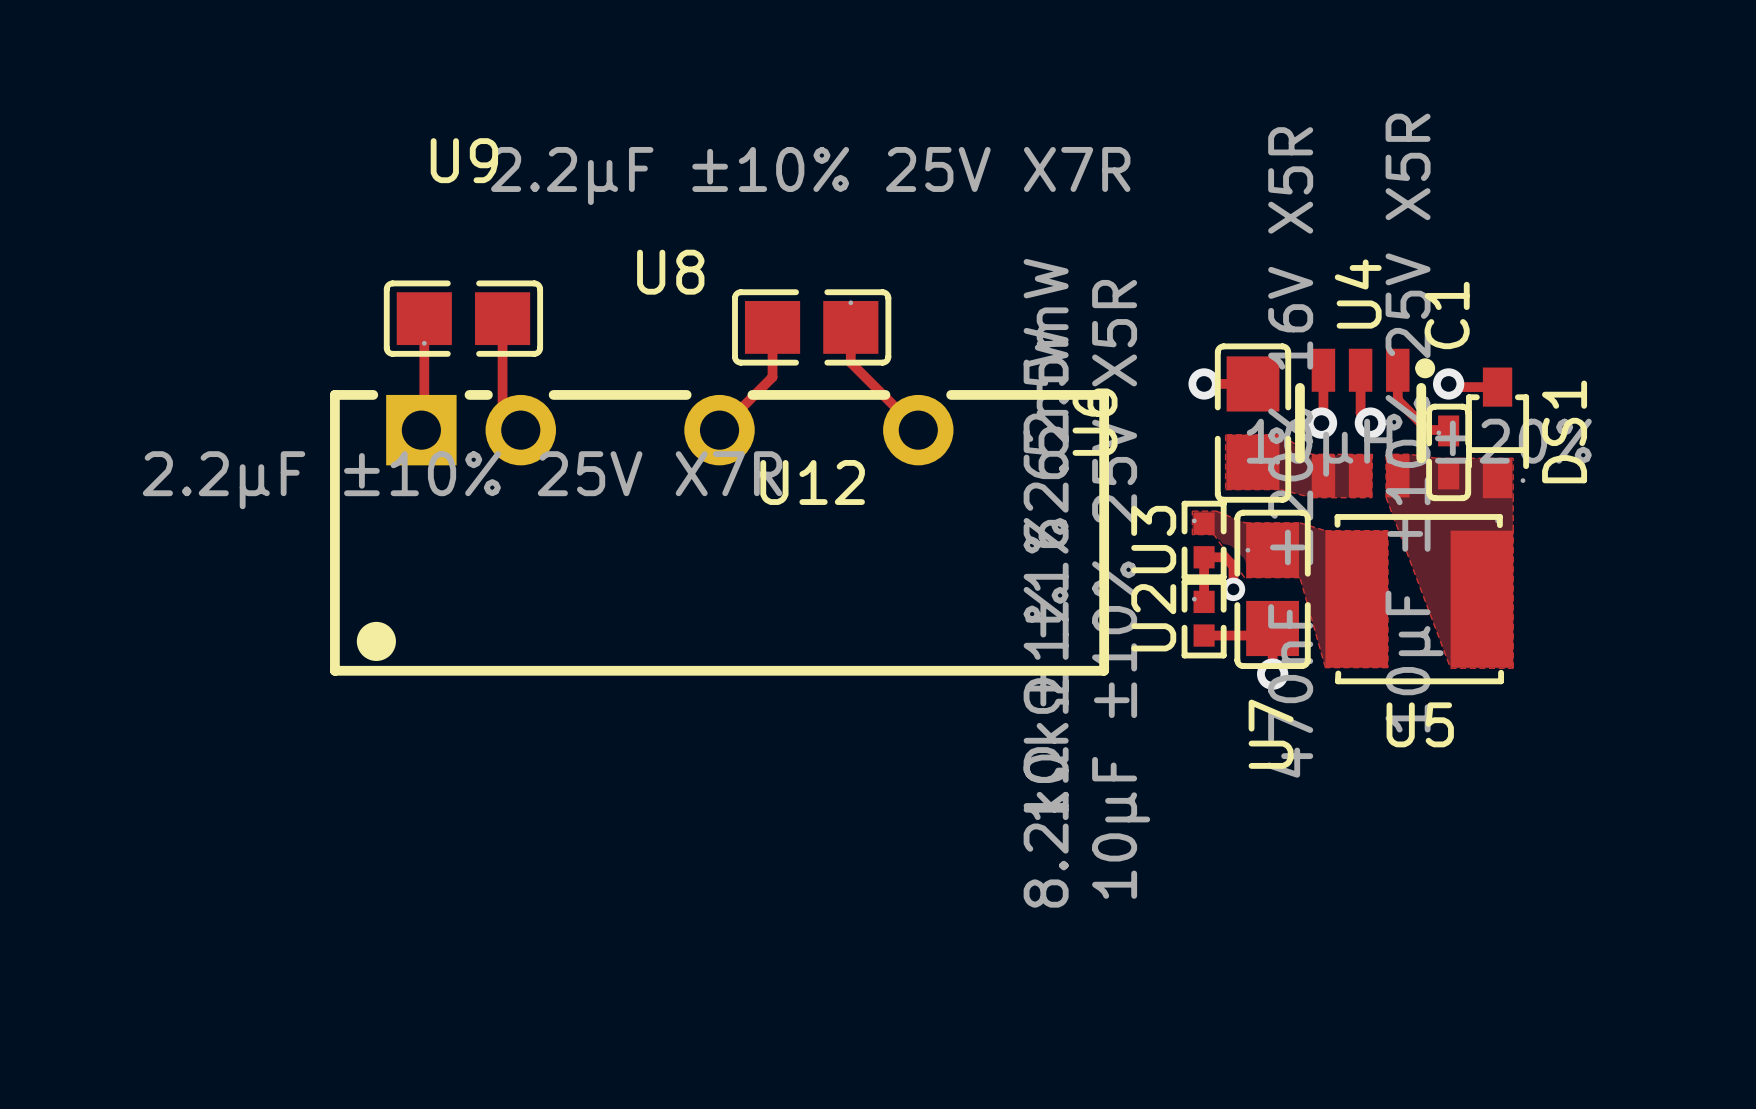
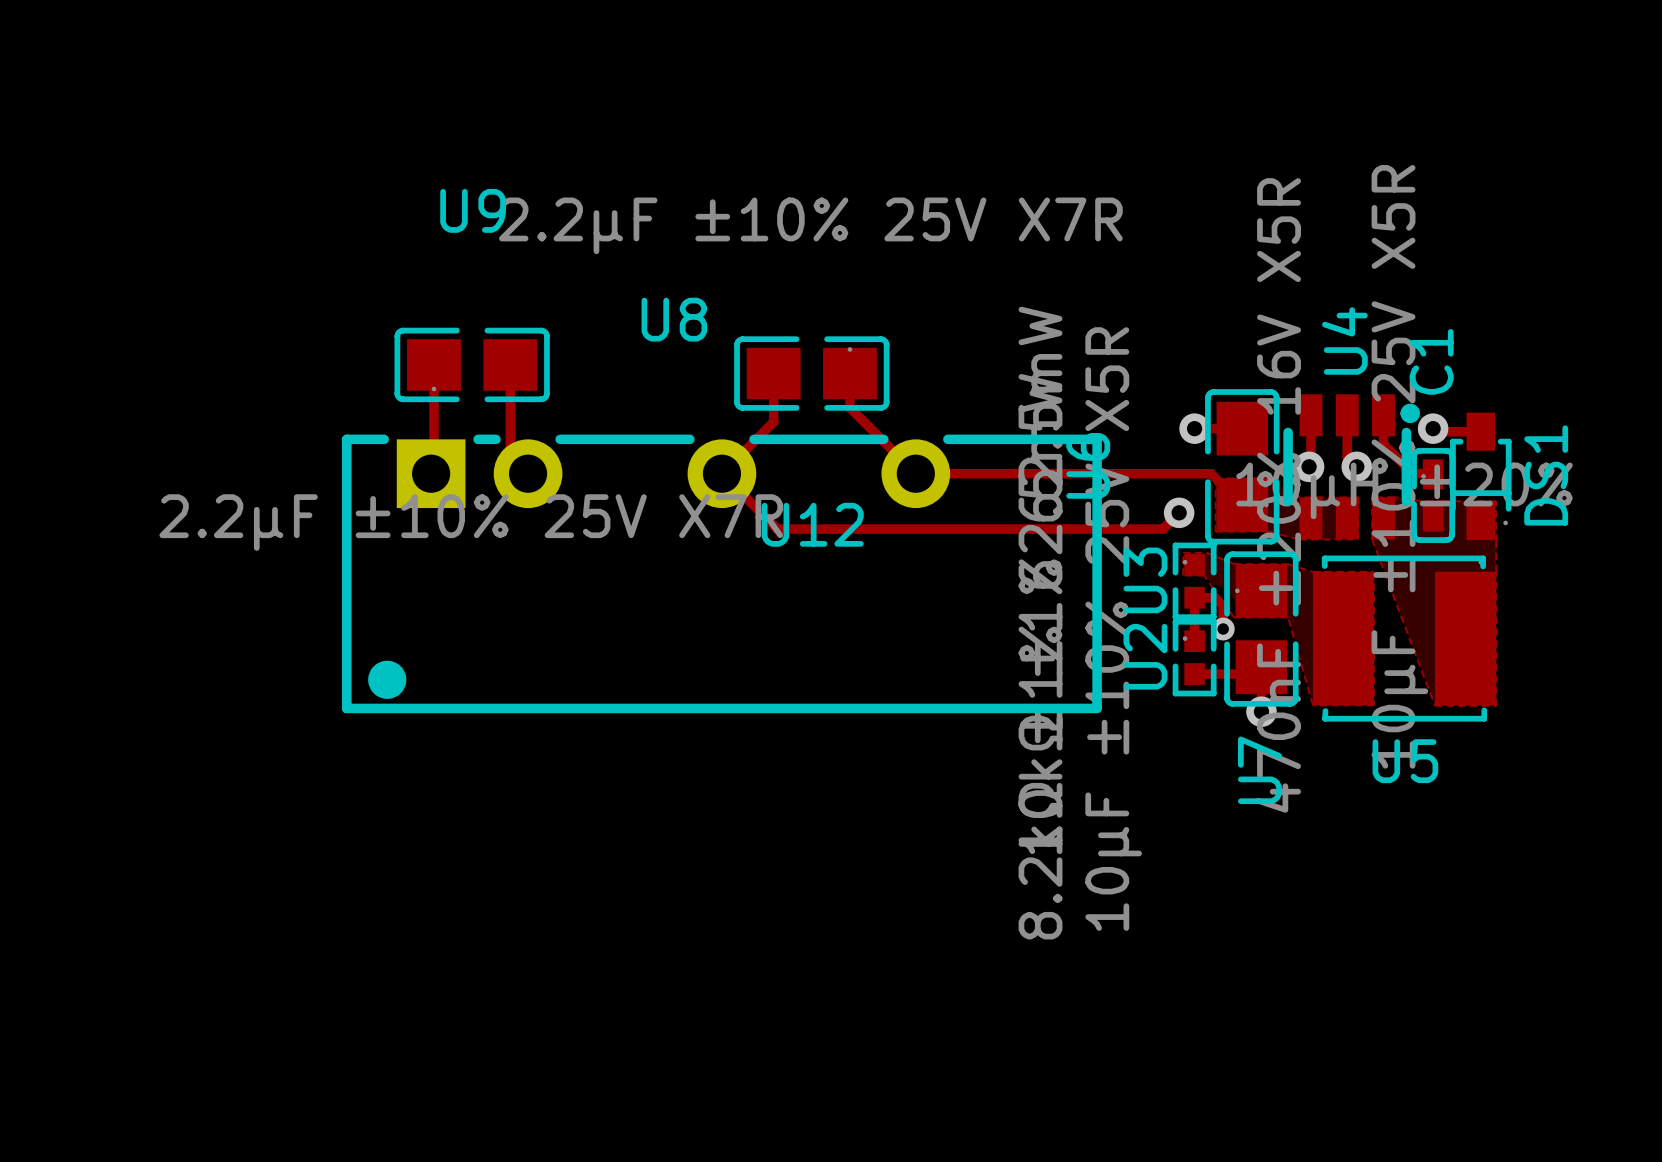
track: none -> (721, 473) (777, 529) (1162, 529) (1179, 512)
track: none -> (915, 473) (1211, 473) (1242, 504)
via: none -> (1179, 512)

